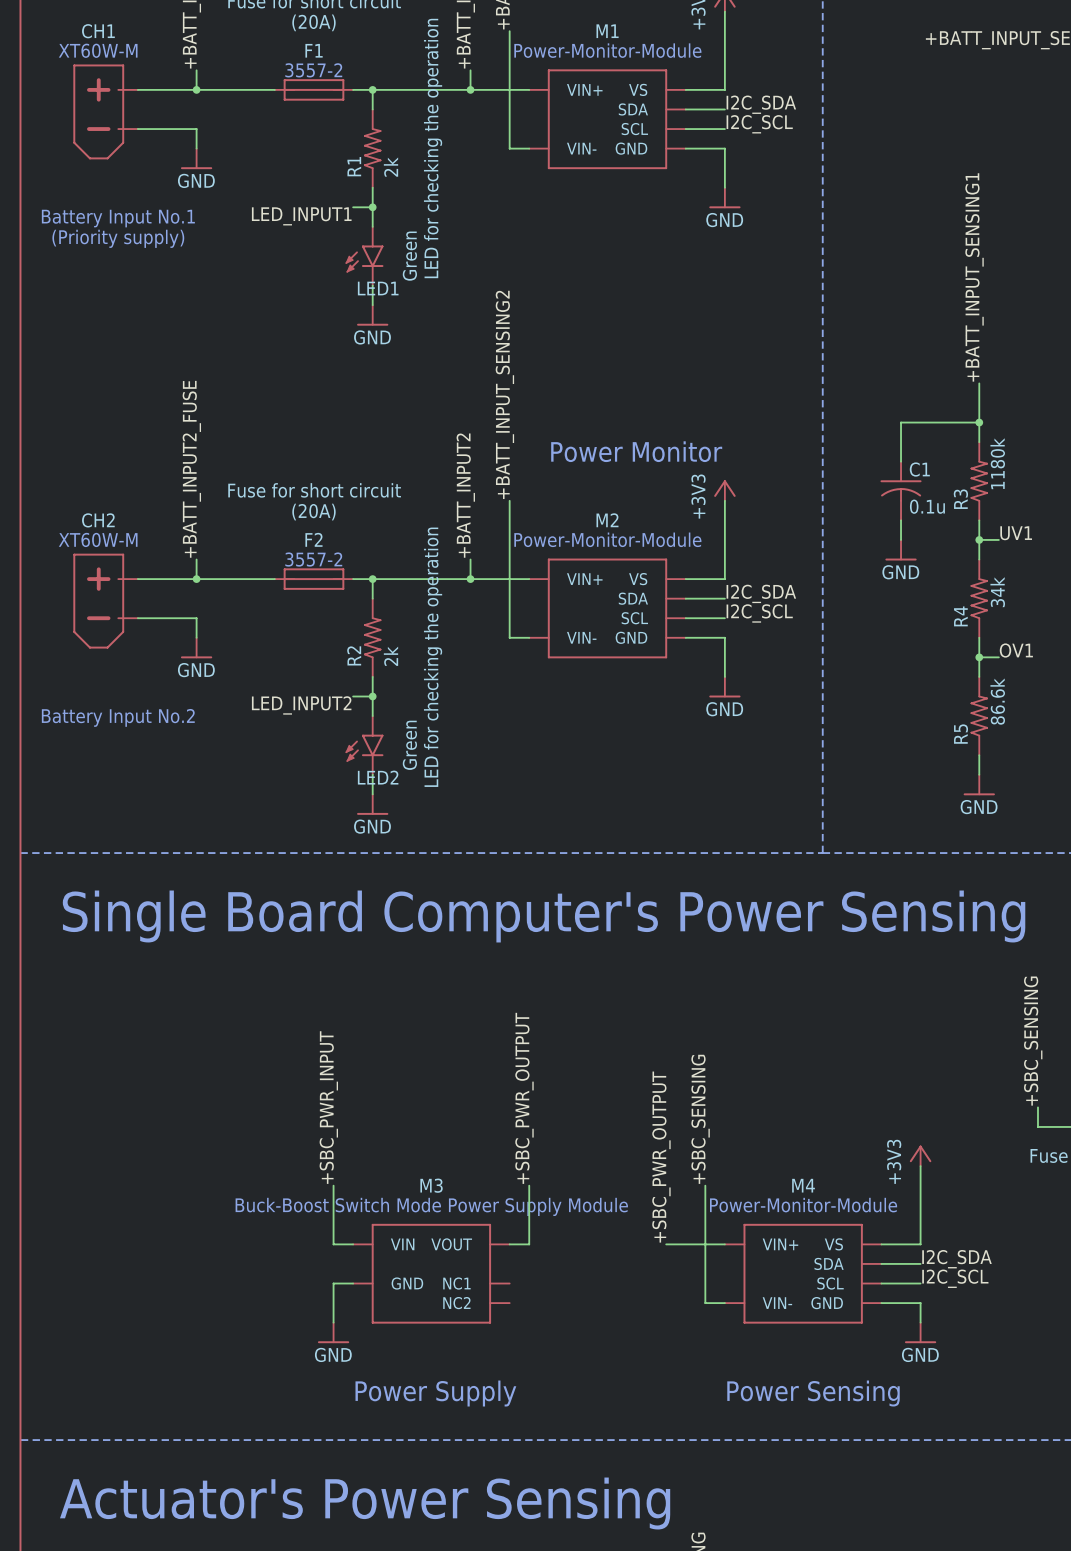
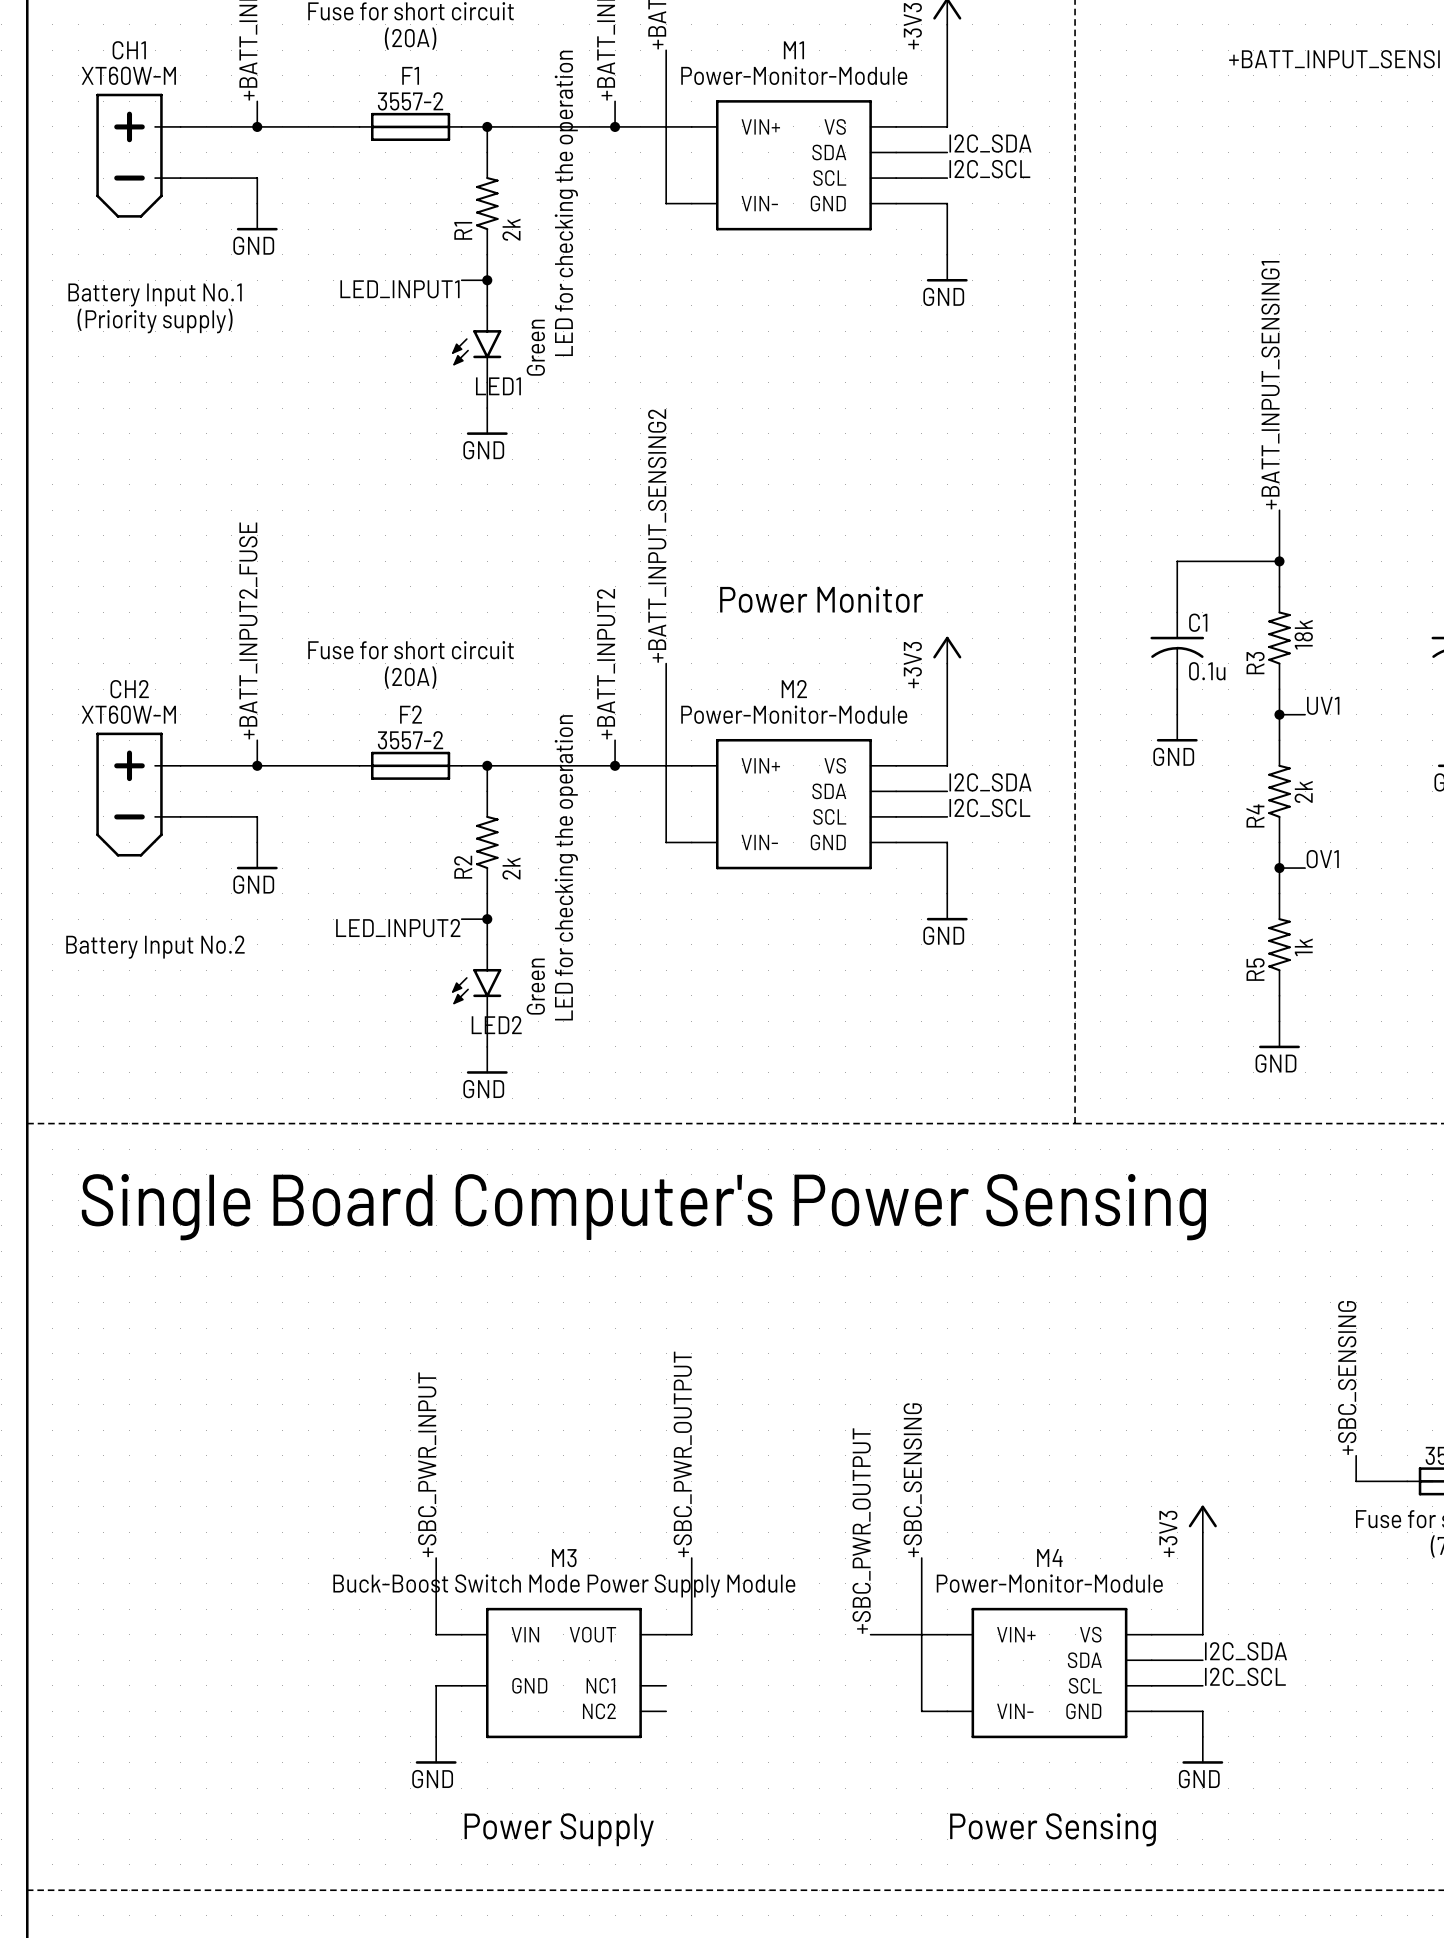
R3 value: 1180k (997, 463) -> 18k (1303, 634)
R4 value: 34k (997, 592) -> 2k (1303, 791)
R5 value: 86.6k (997, 701) -> 1k (1303, 947)

